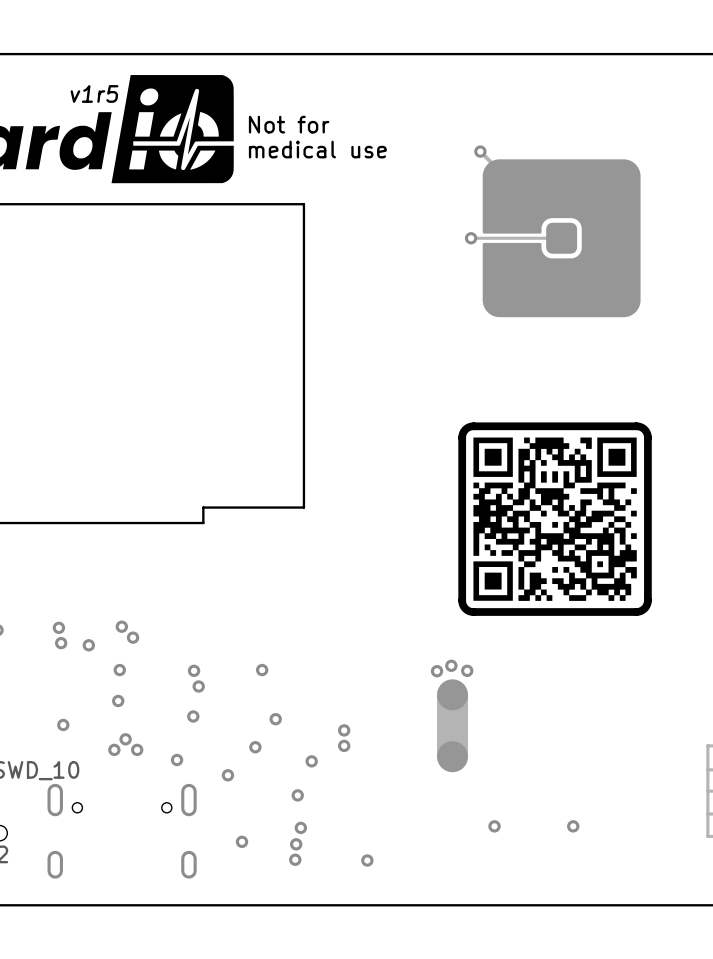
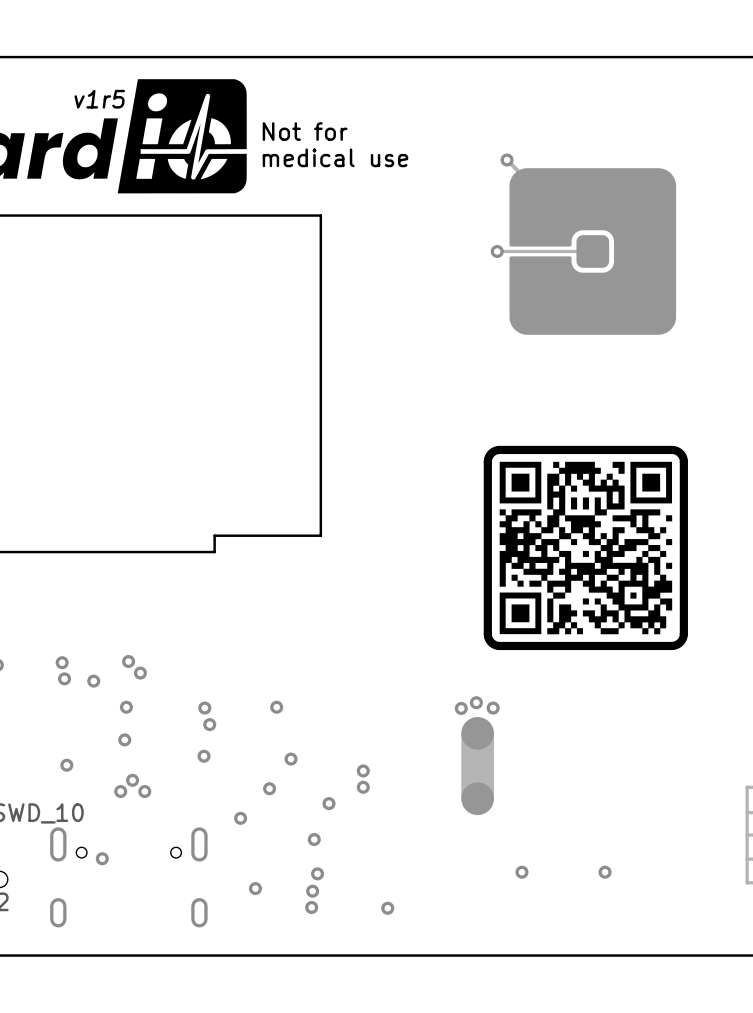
via: (177, 760) -> none
via: none -> (102, 858)

